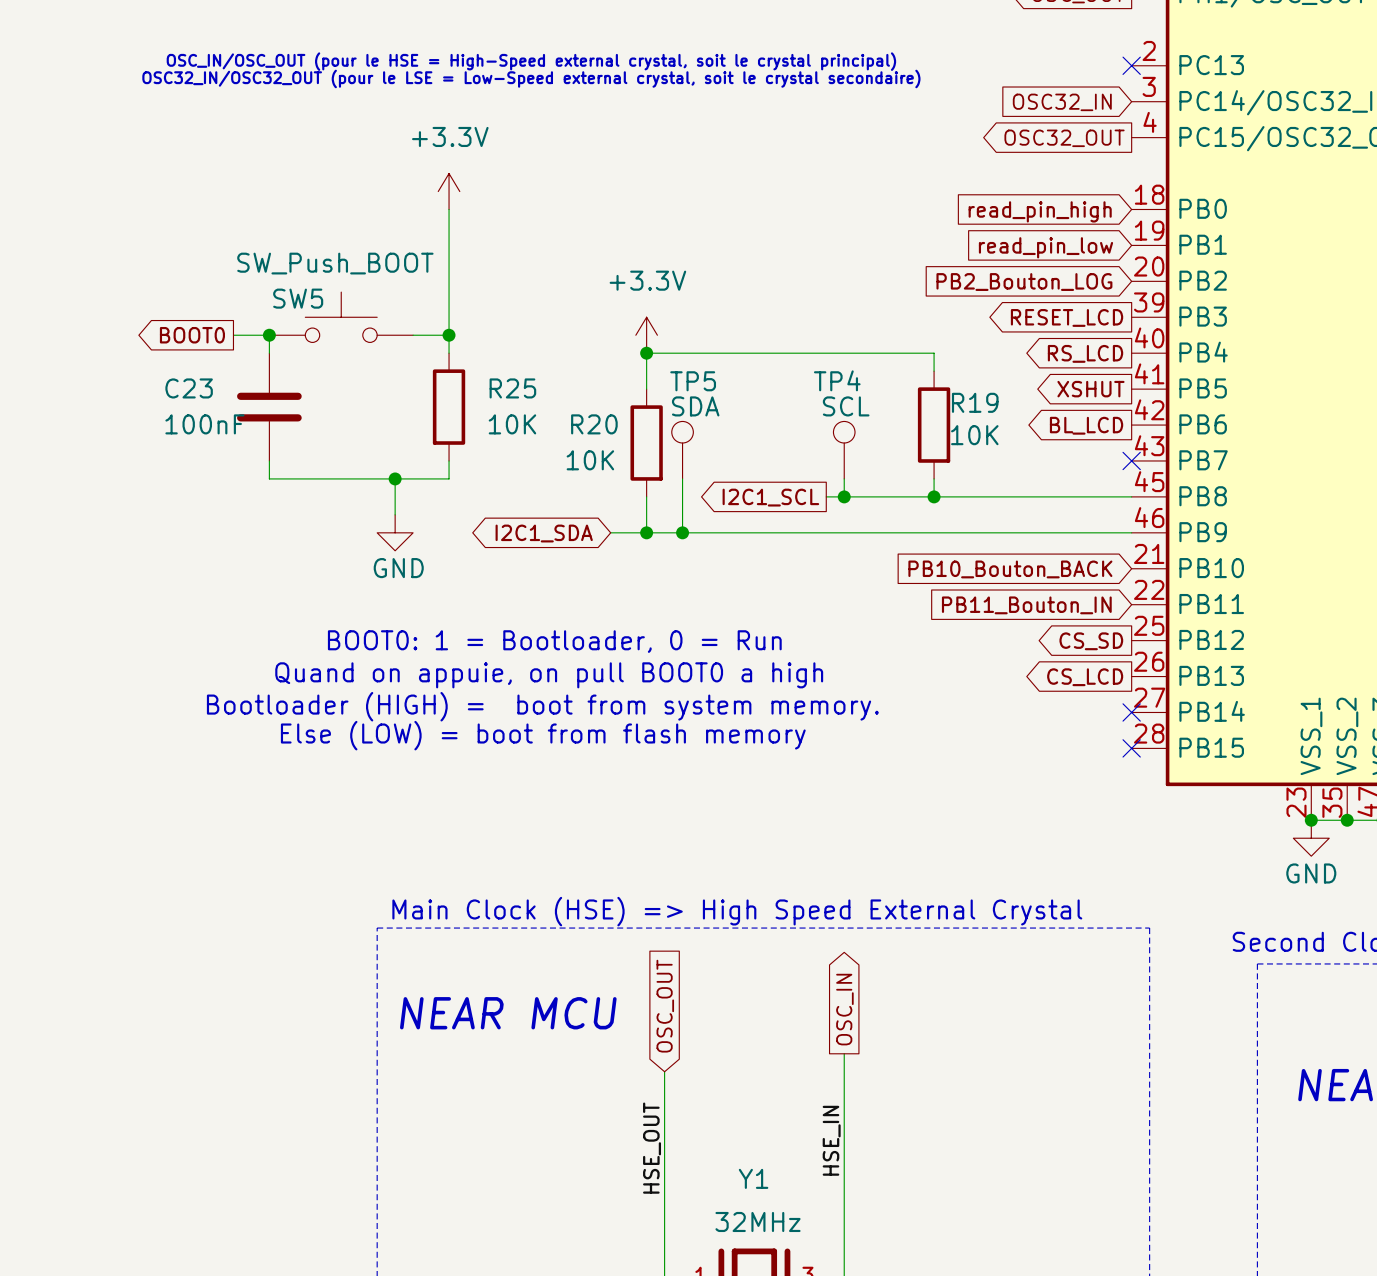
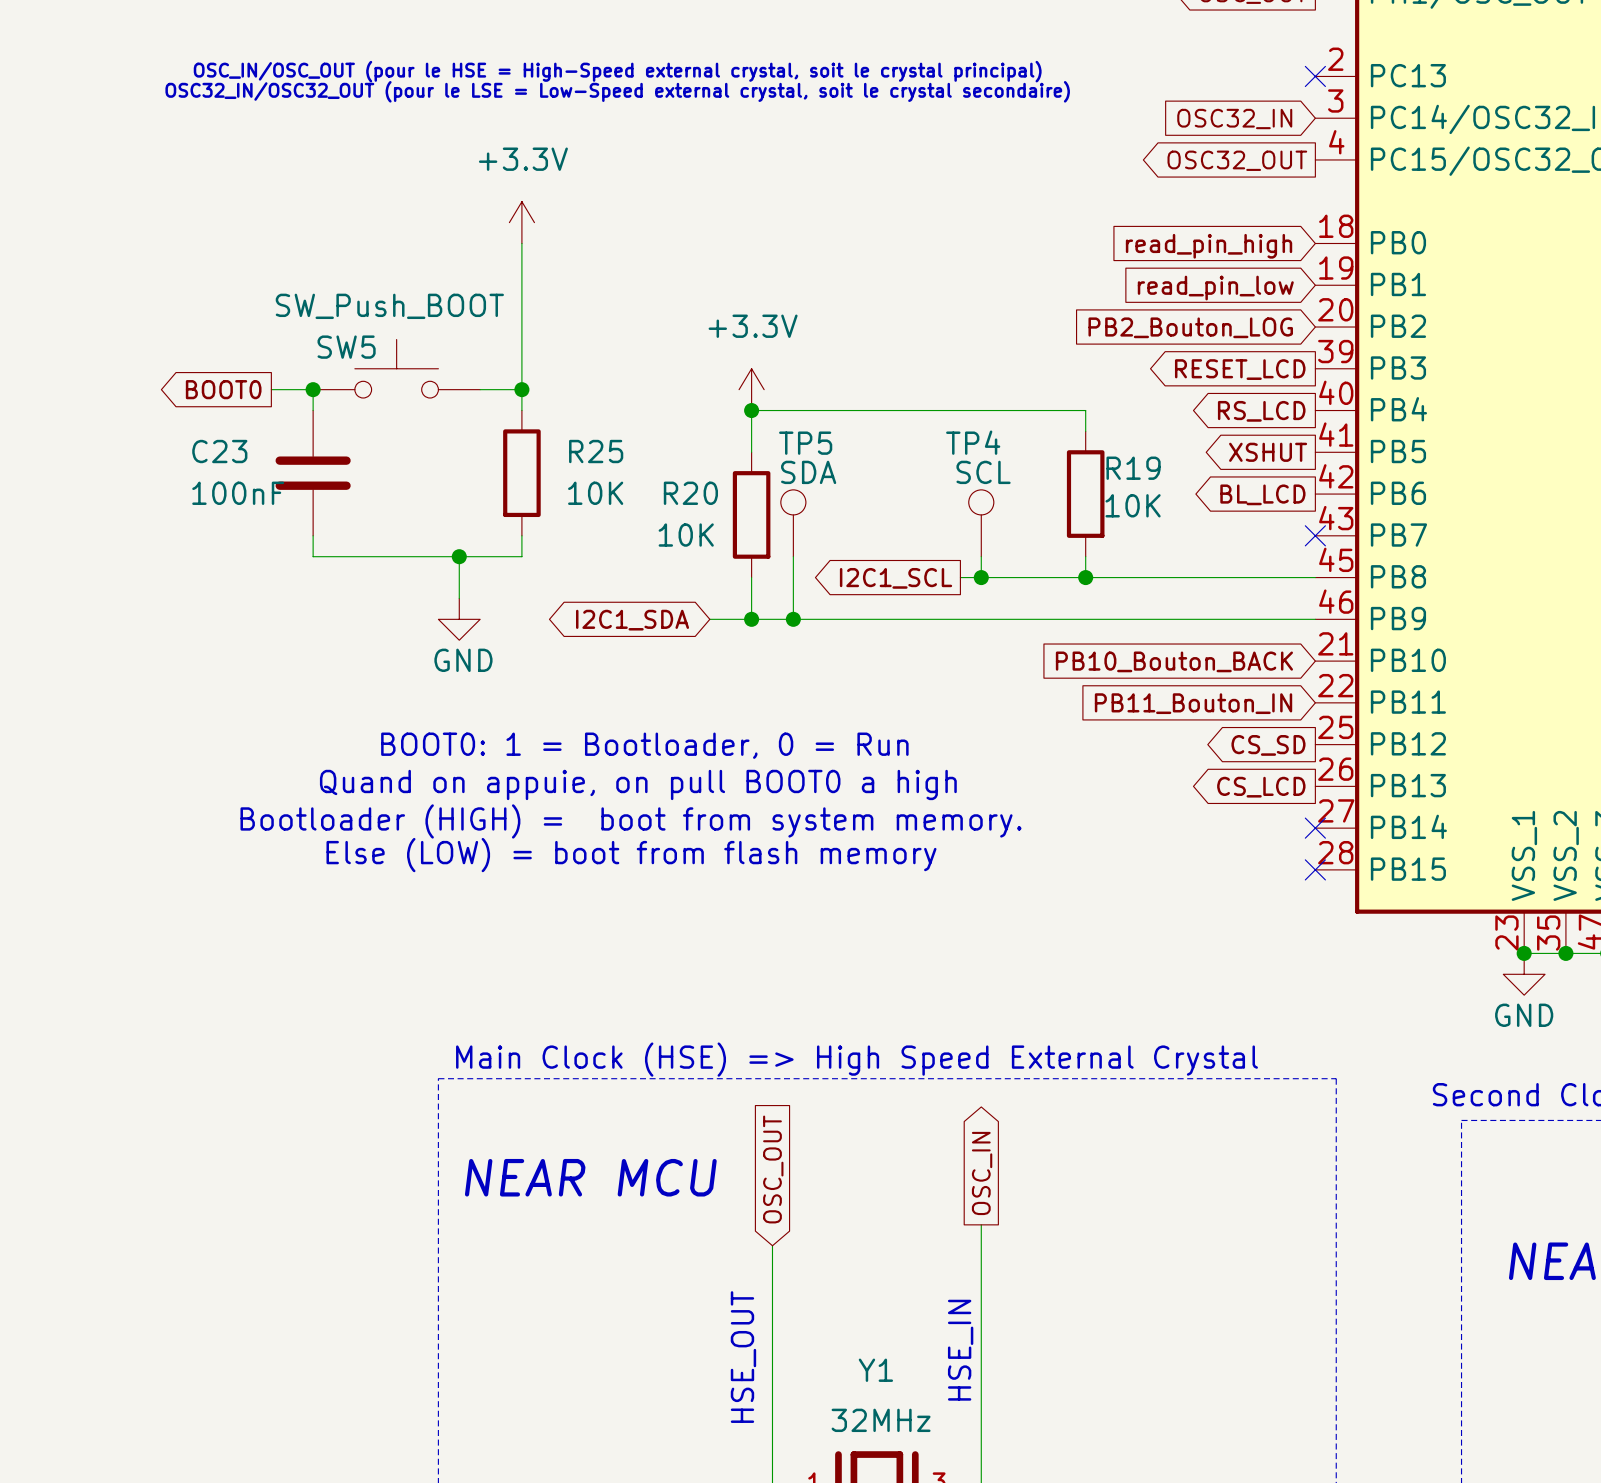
label: HSE_IN (831, 1140) -> none
label: HSE_OUT (652, 1148) -> none
text: none -> HSE_IN (960, 1350)
text: none -> HSE_OUT (743, 1357)

